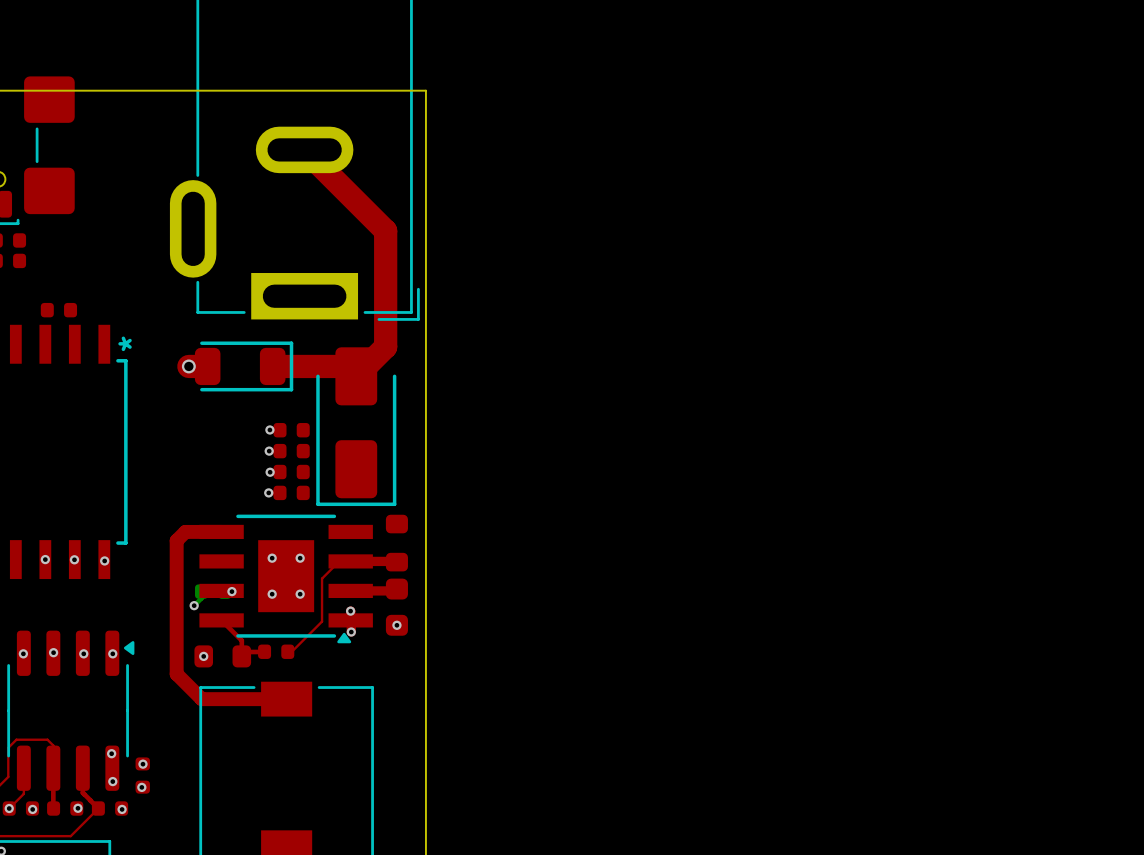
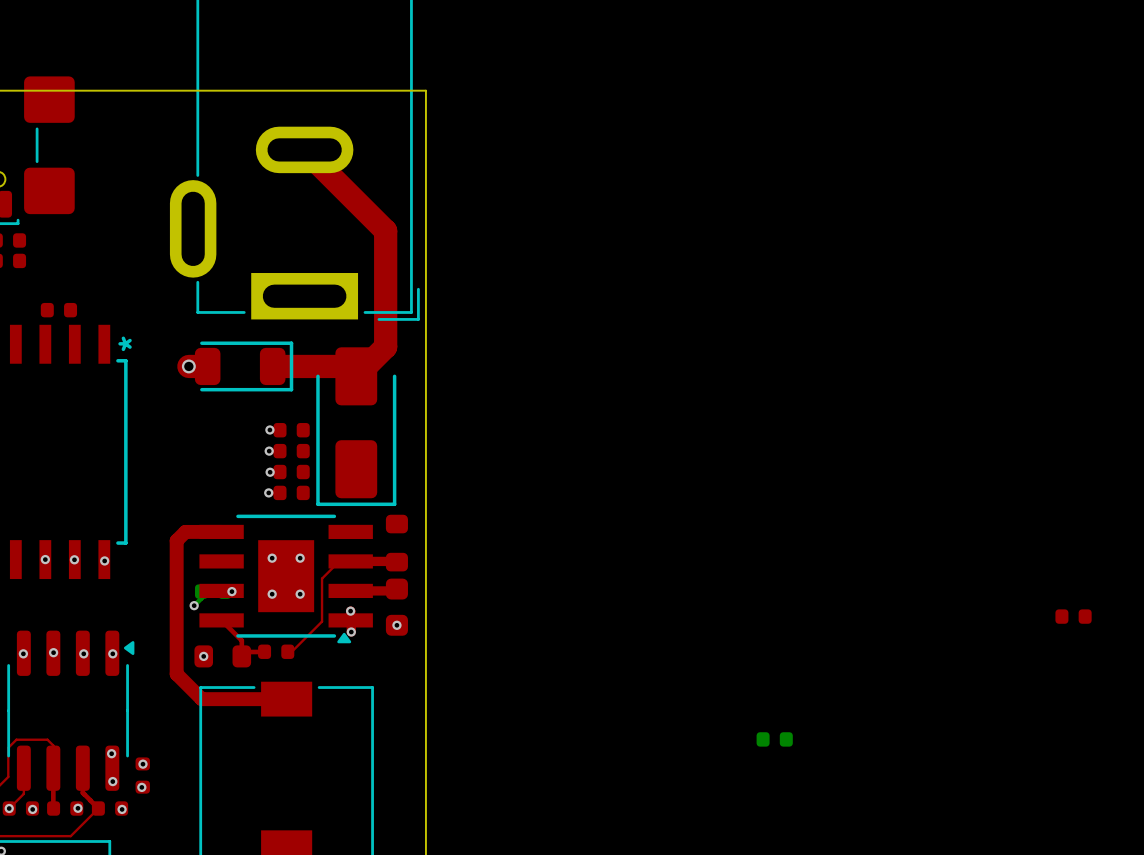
part: none -> (1073, 616)
part: none -> (774, 739)

